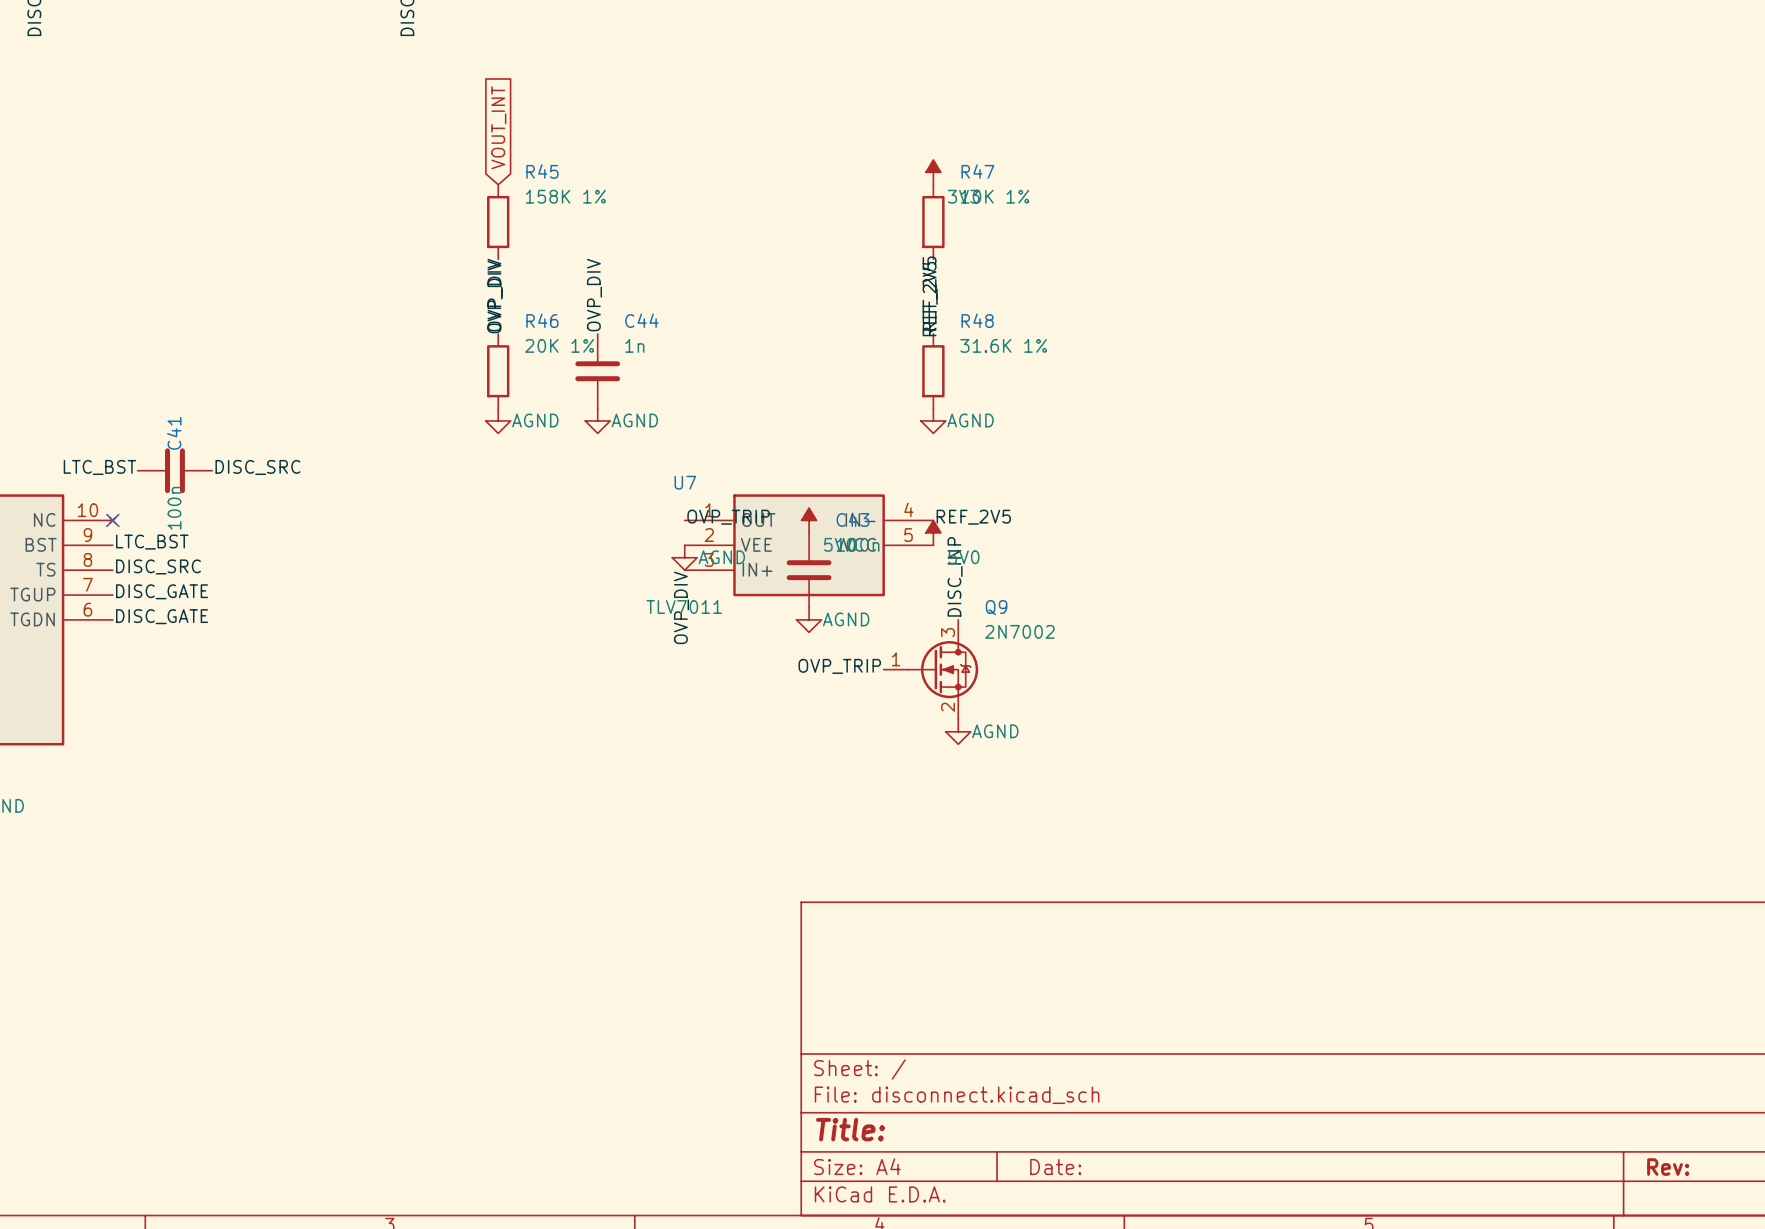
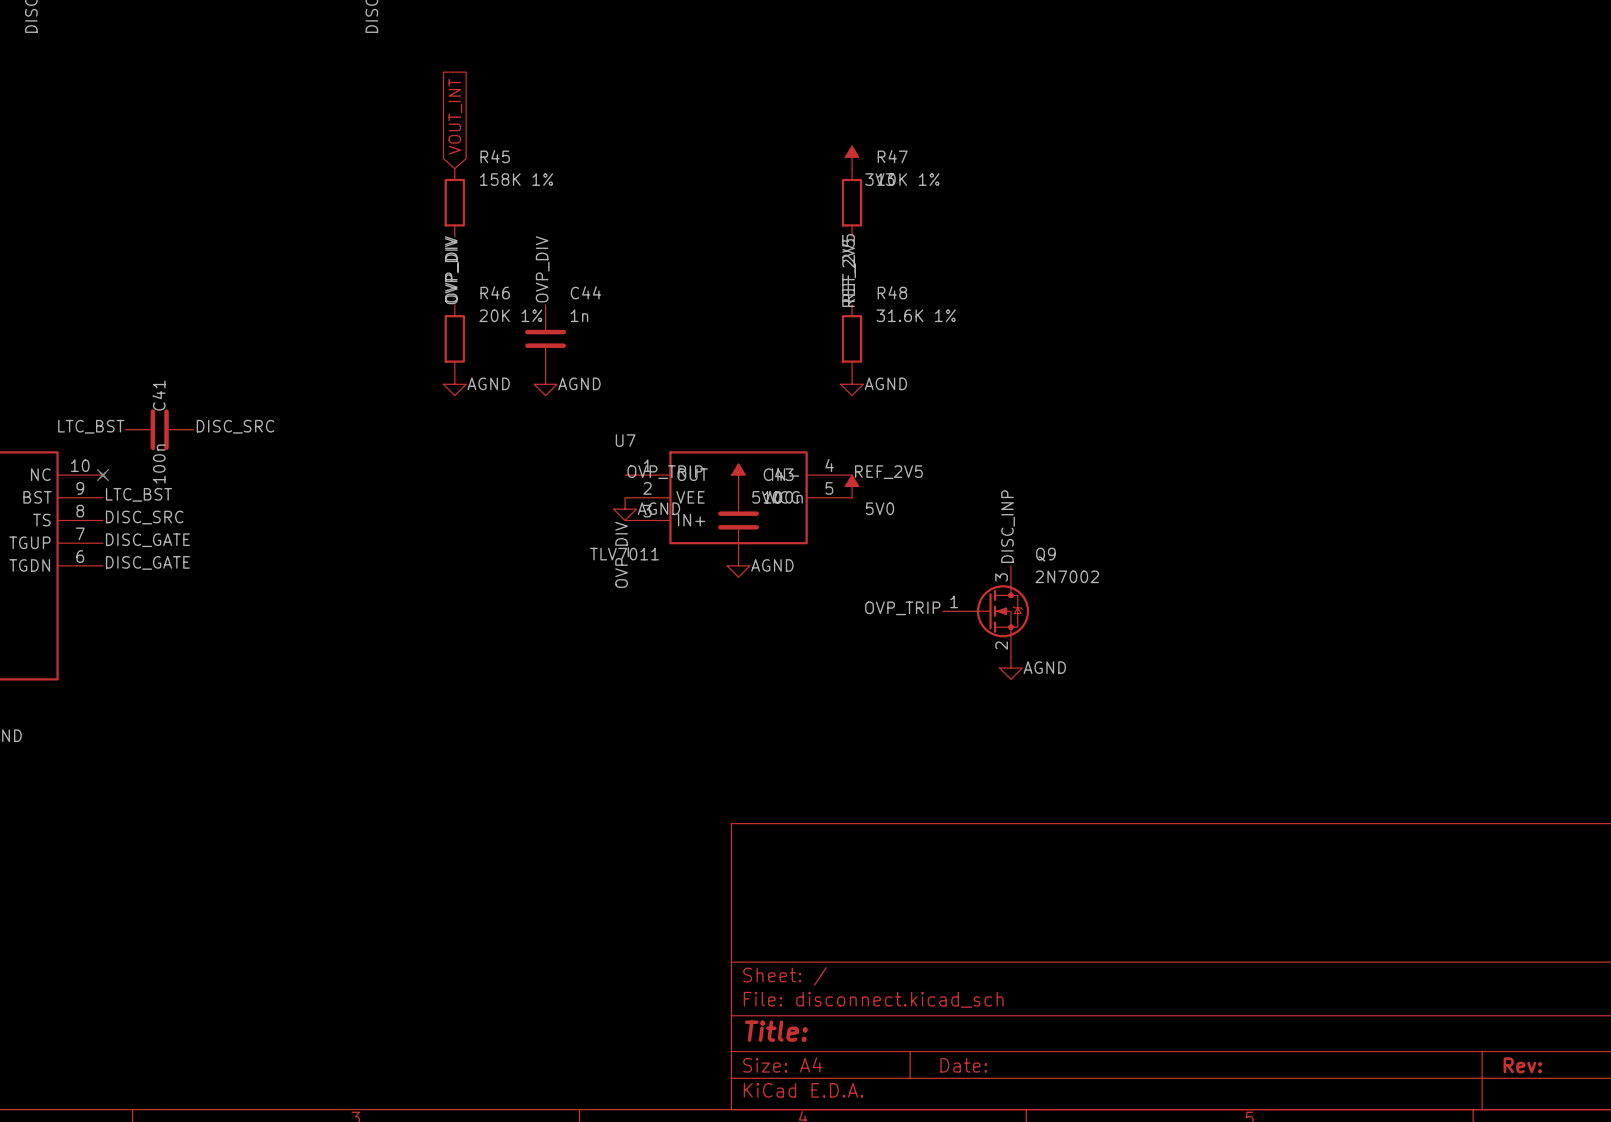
label position: DISC_INP (955, 576) -> DISC_INP (1008, 526)
label position: OVP_TRIP (839, 666) -> OVP_TRIP (902, 608)
Q9 position: (930, 669) -> (985, 611)
power symbol position: AGND (958, 731) -> AGND (1010, 668)

